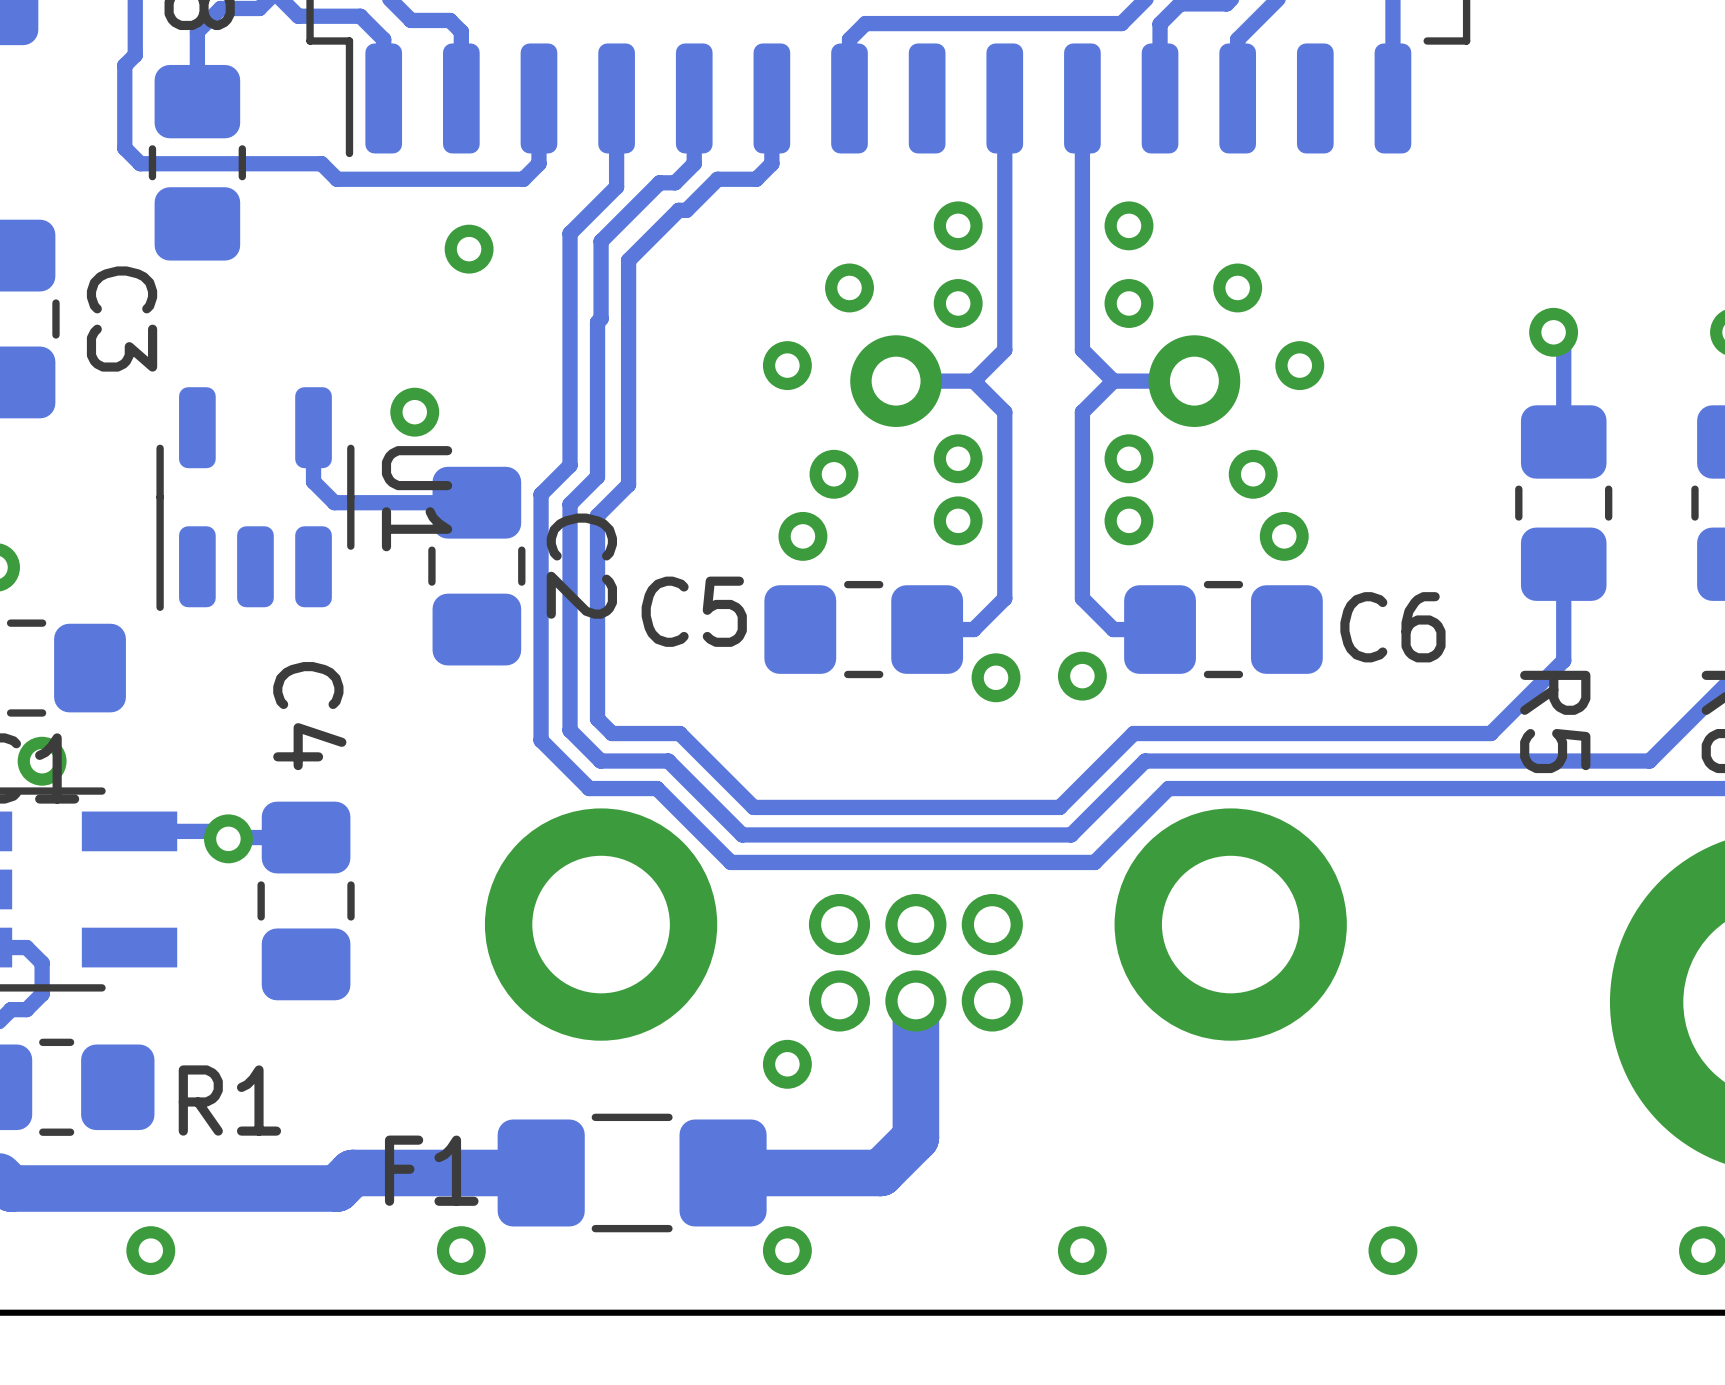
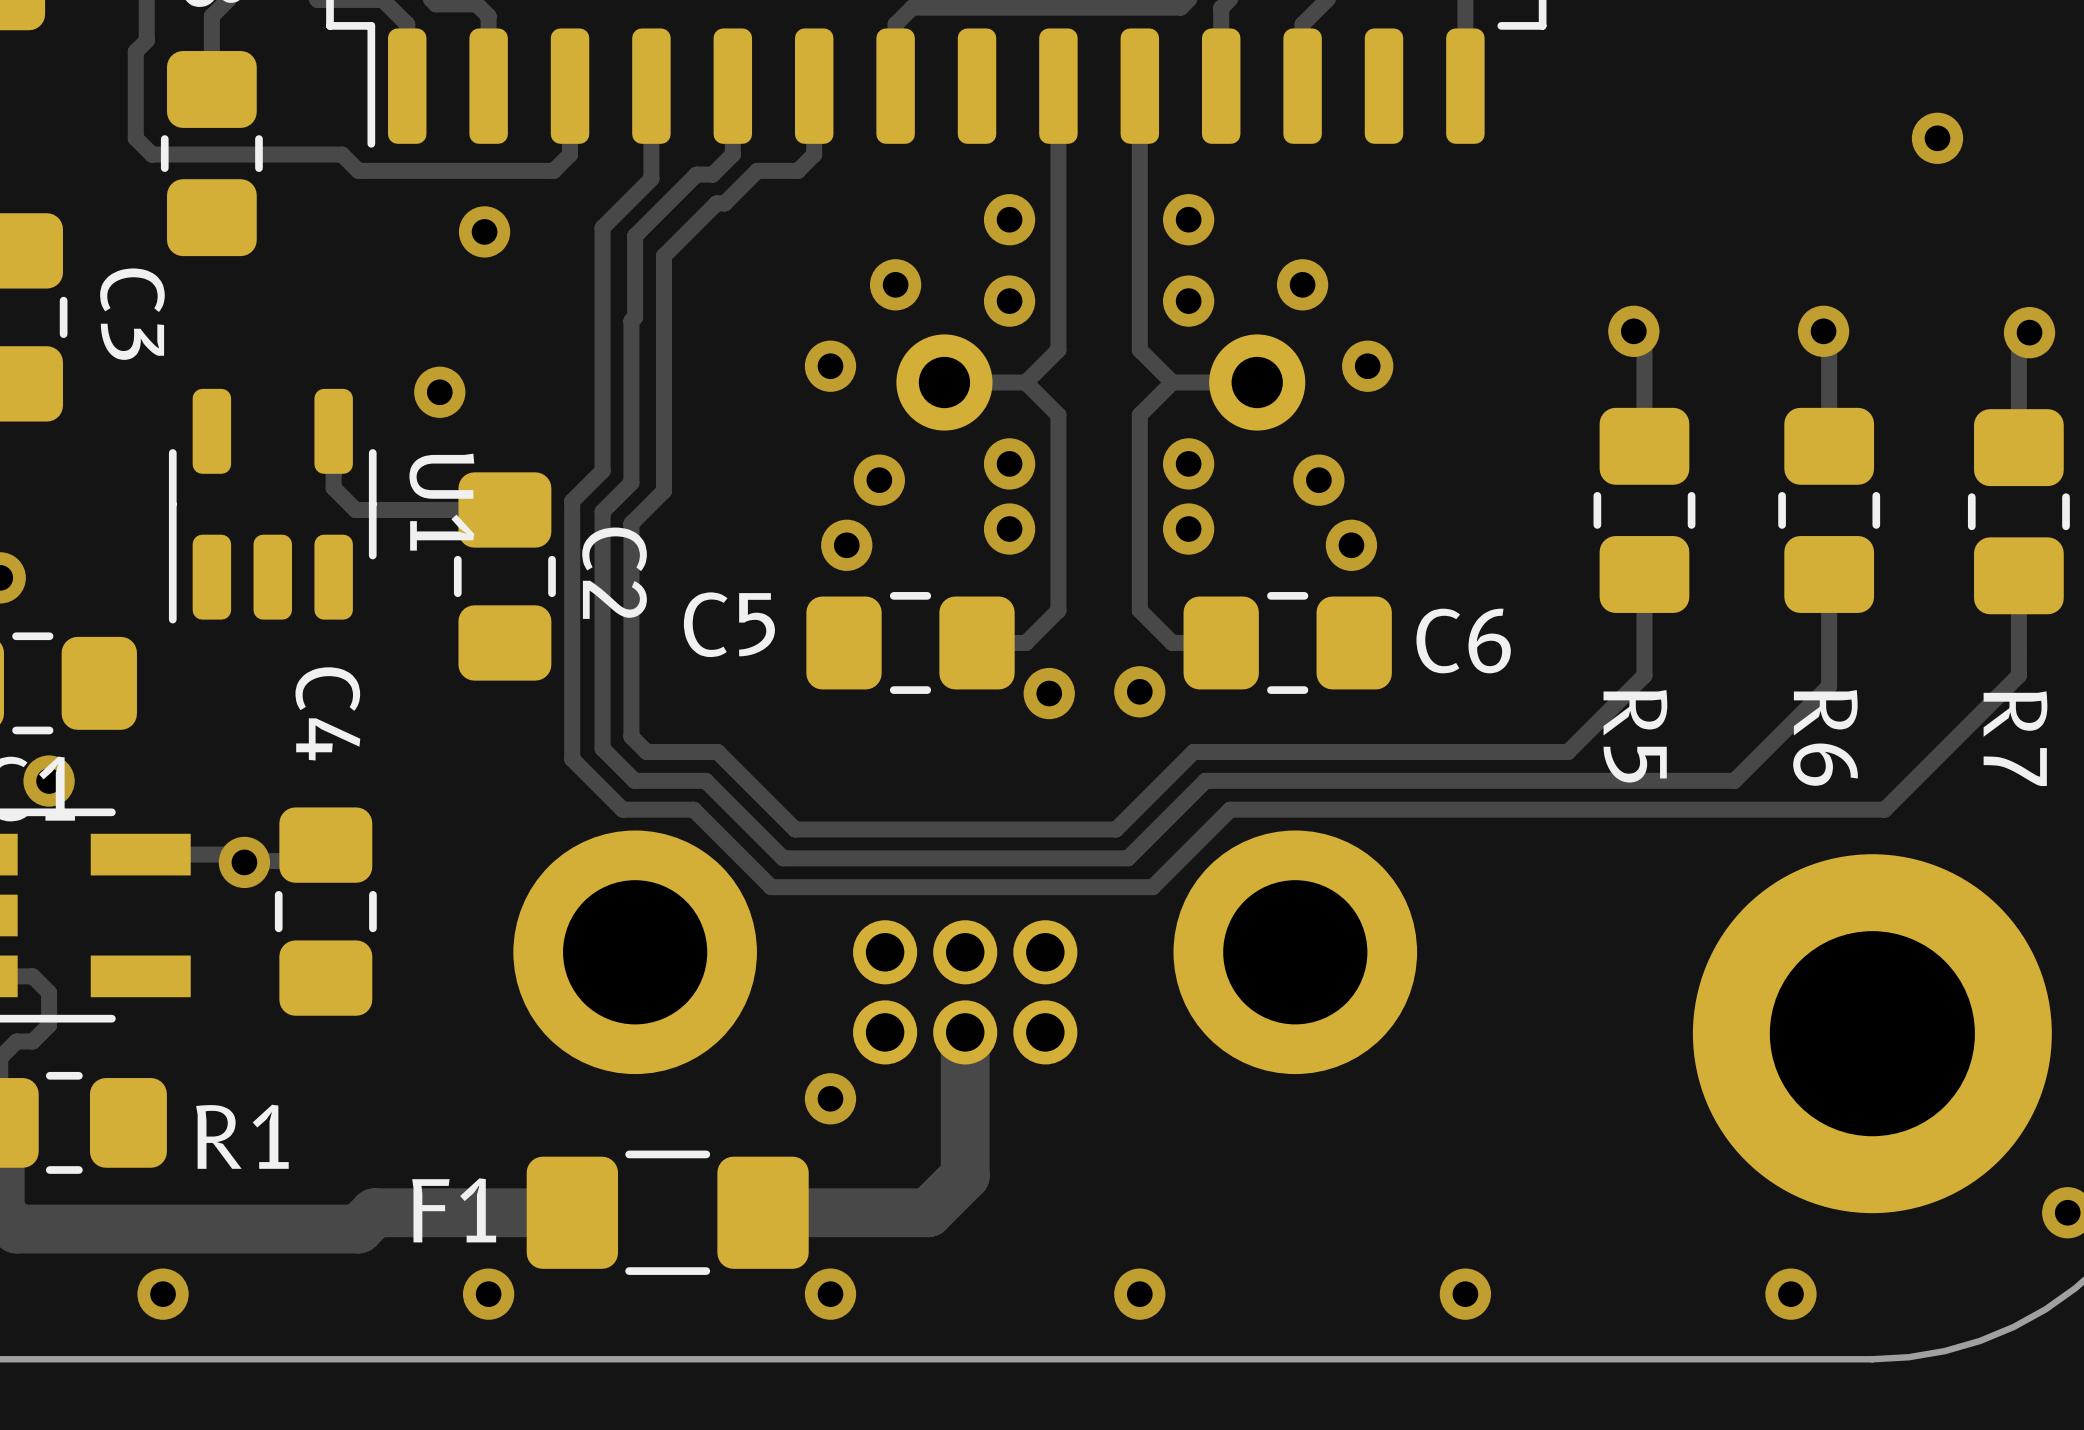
via position: (469, 249) -> (484, 231)
via position: (414, 412) -> (439, 392)
C4 position: (306, 900) -> (325, 911)

